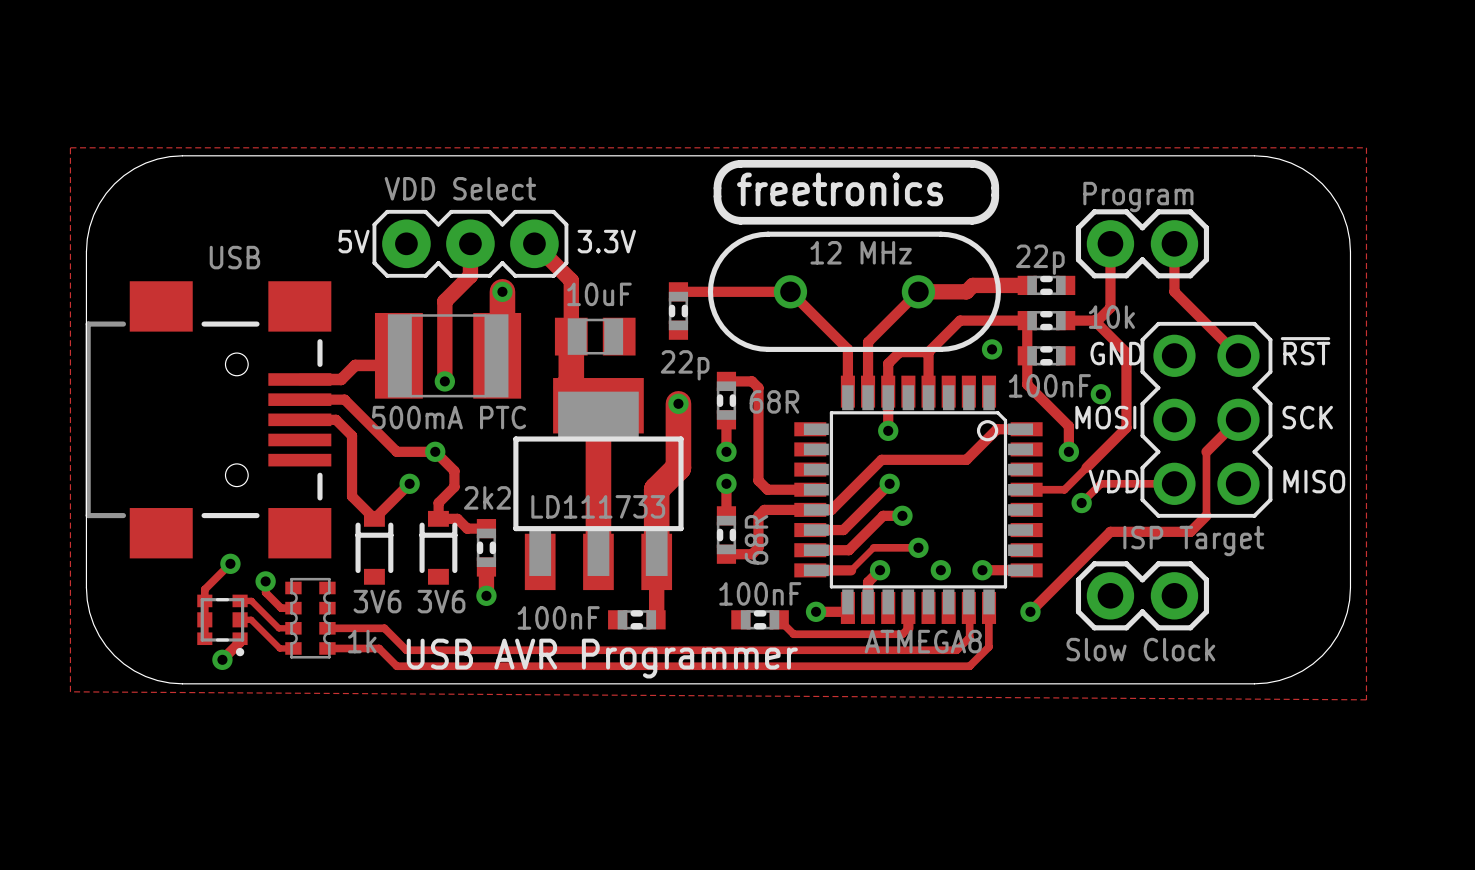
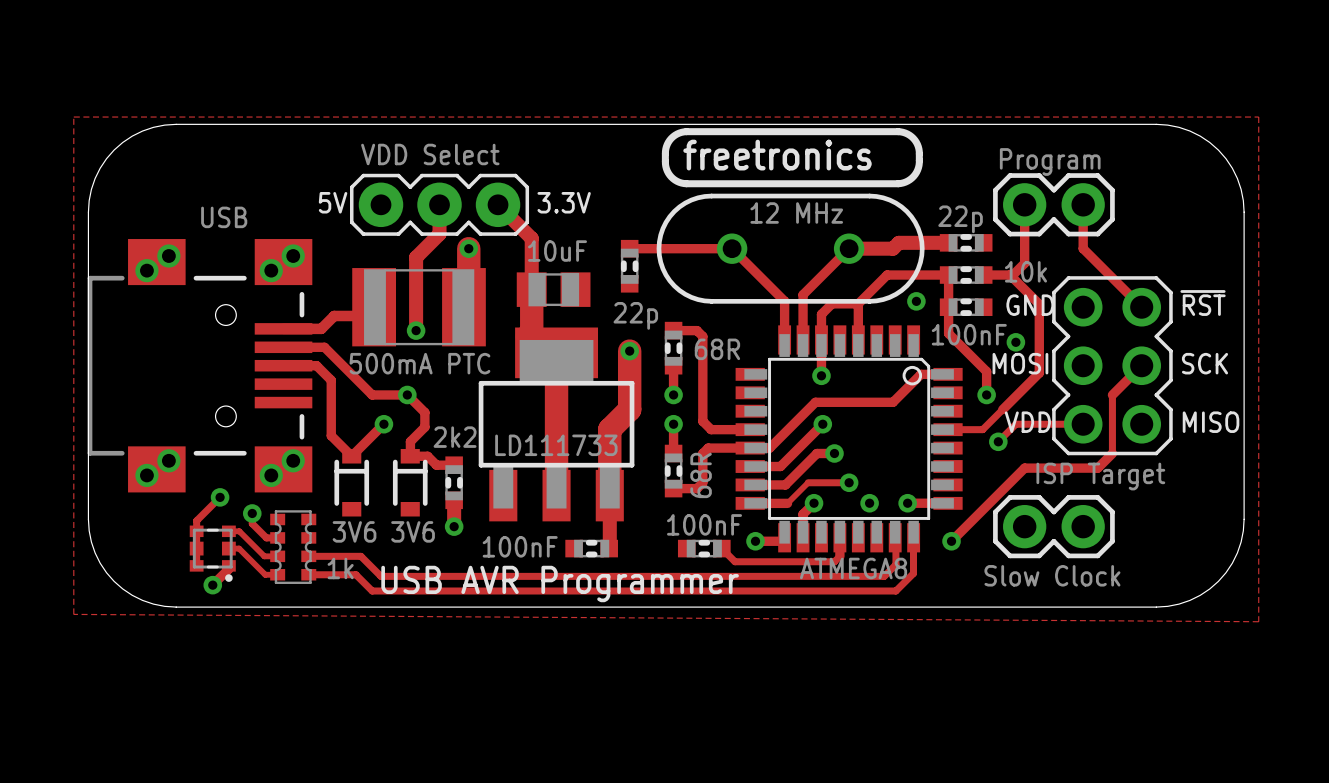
via: none -> (168, 256)
via: none -> (293, 256)
via: none -> (146, 270)
via: none -> (271, 270)
via: none -> (168, 460)
via: none -> (293, 460)
via: none -> (146, 475)
via: none -> (271, 475)

